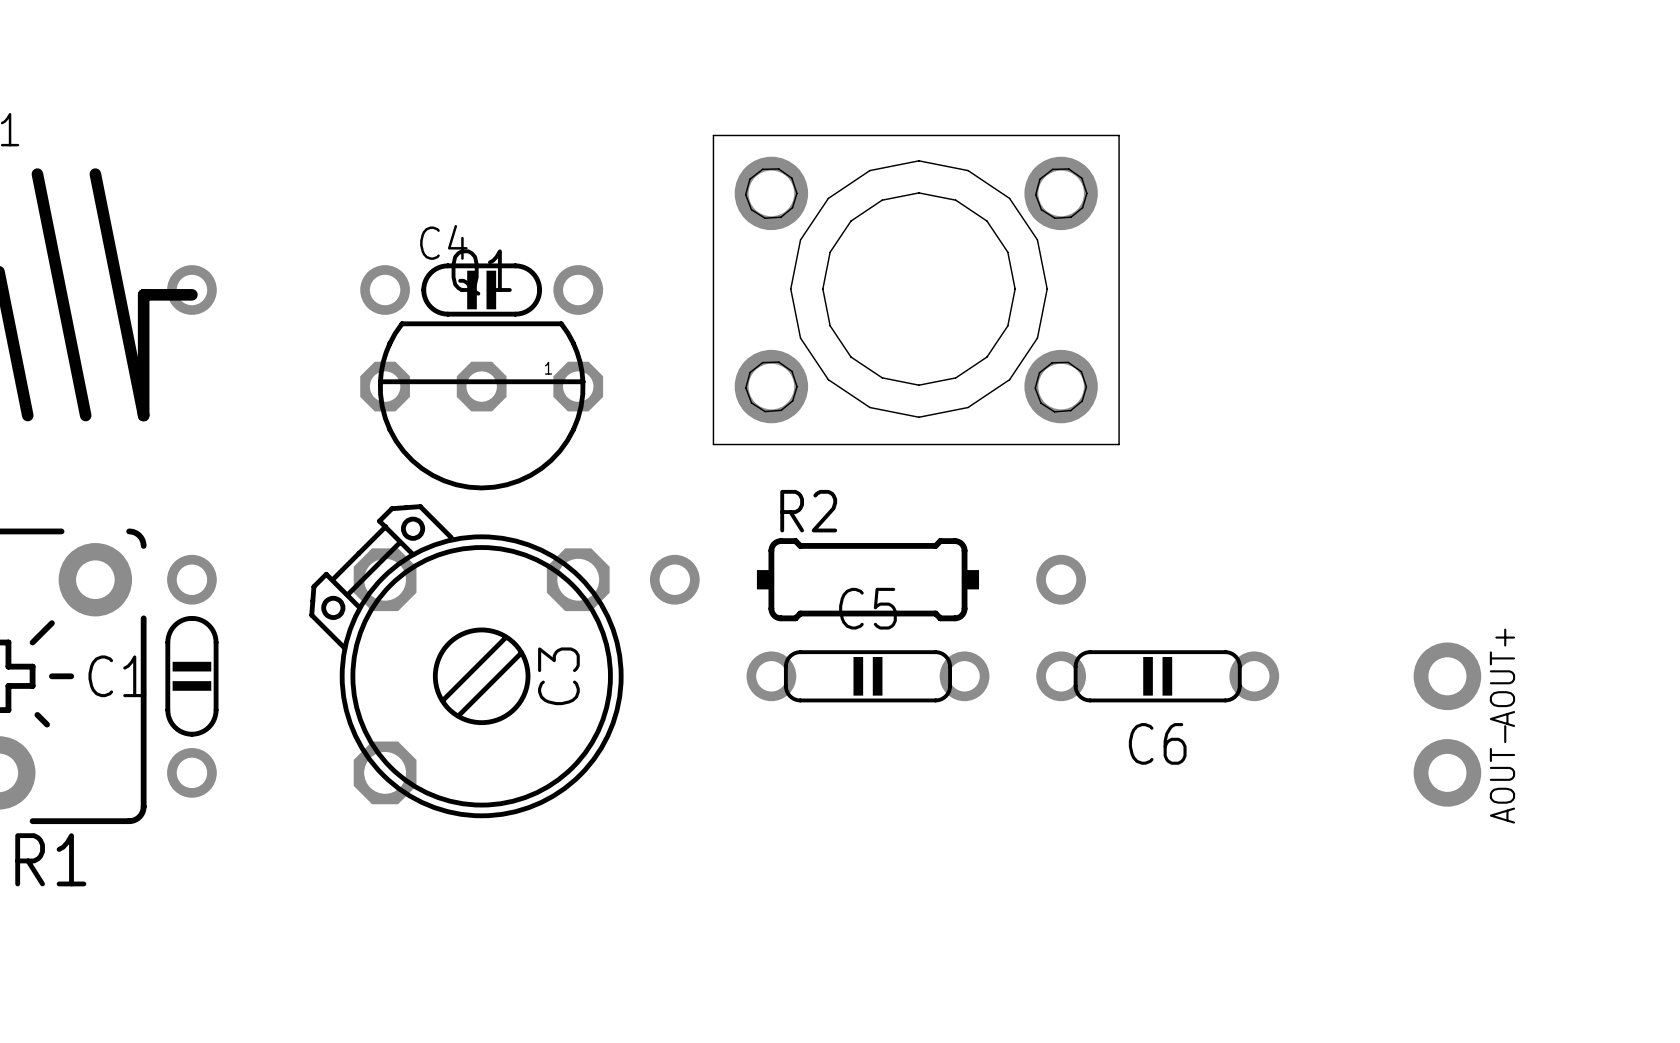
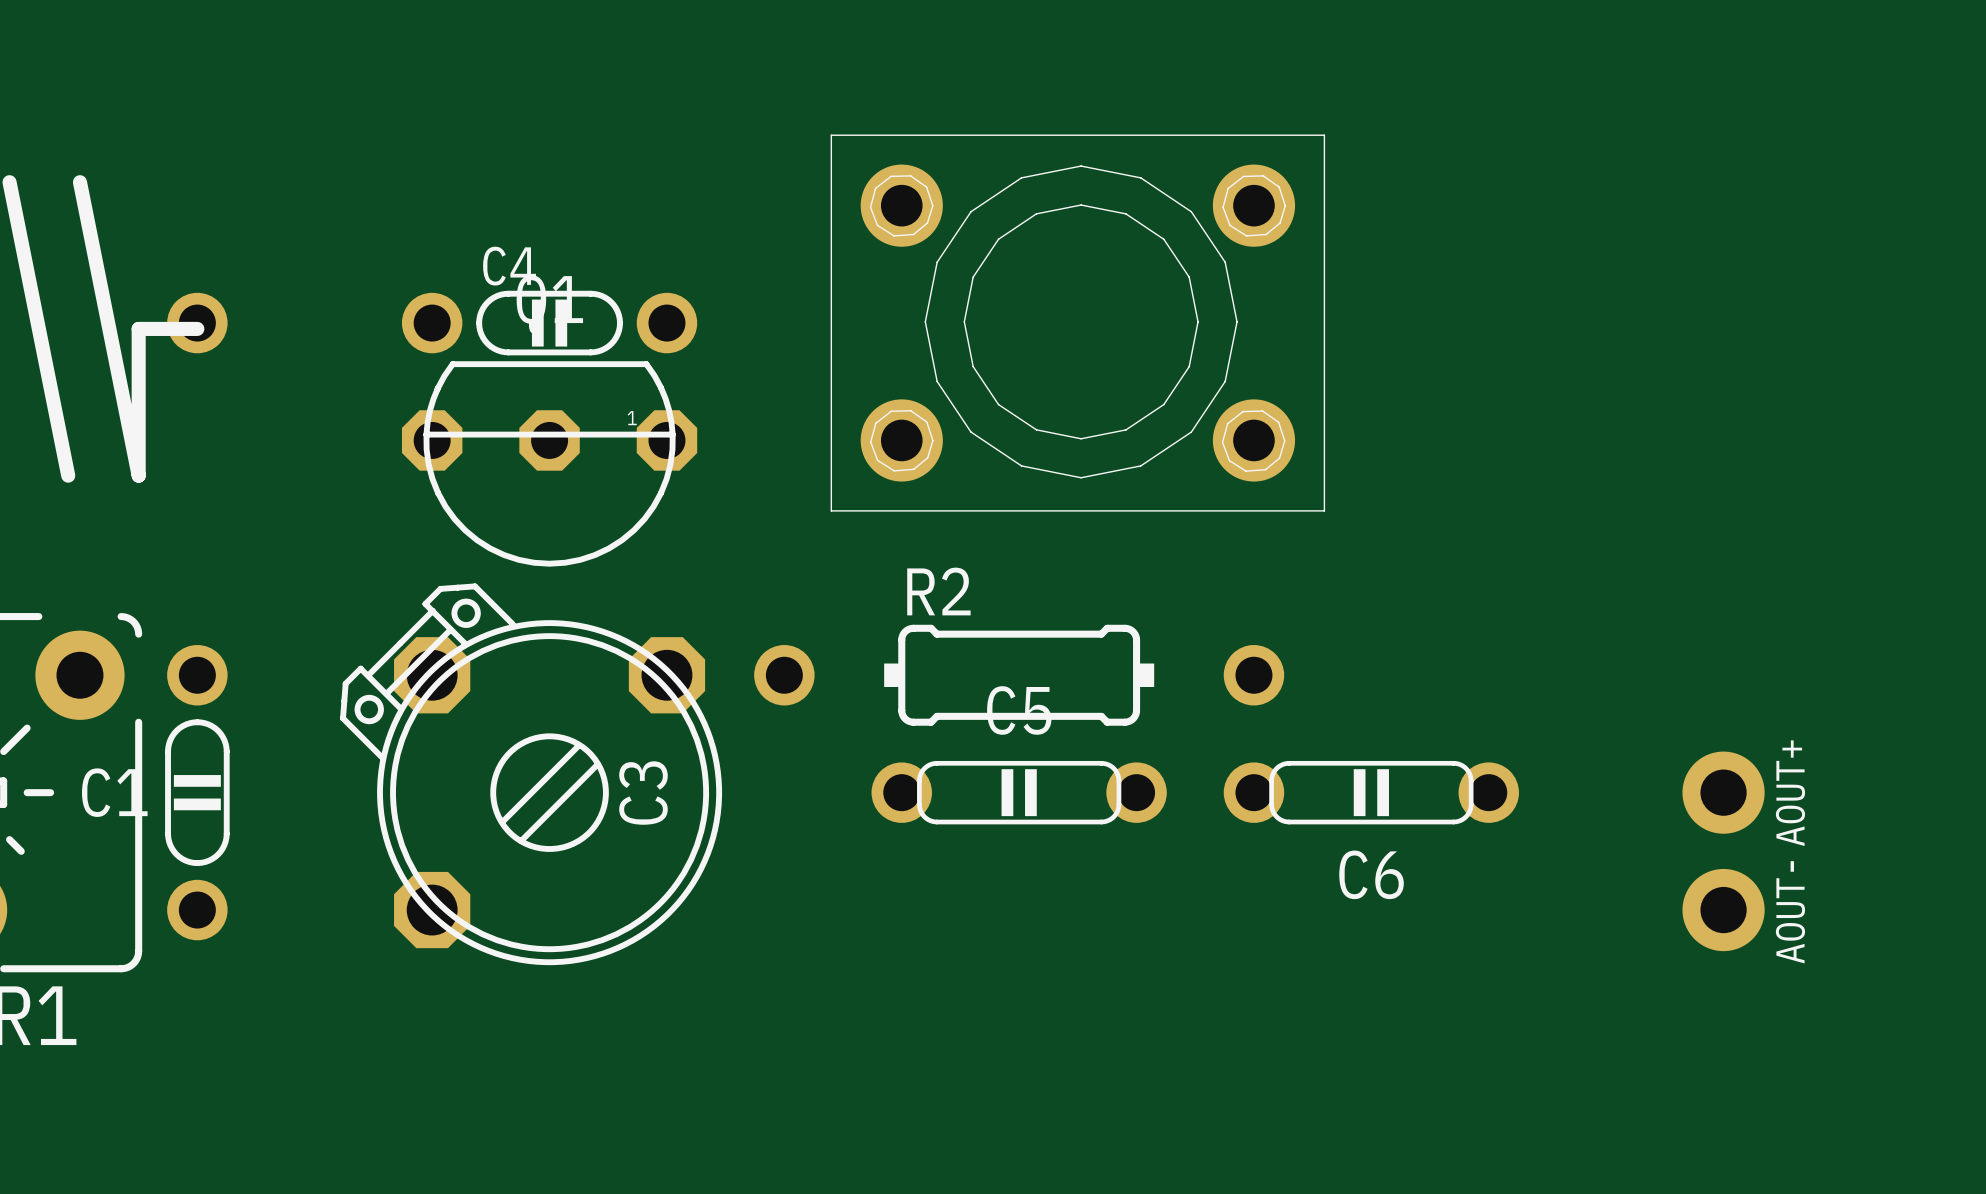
part footprint: [713, 135, 1120, 445] -> [831, 135, 1325, 511]

